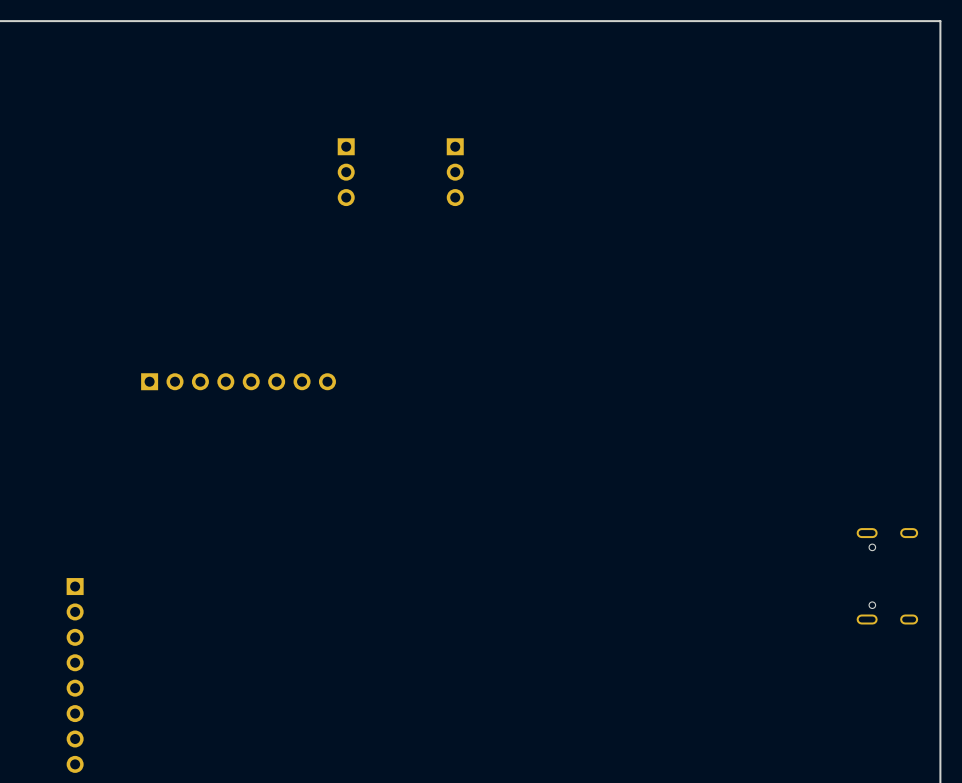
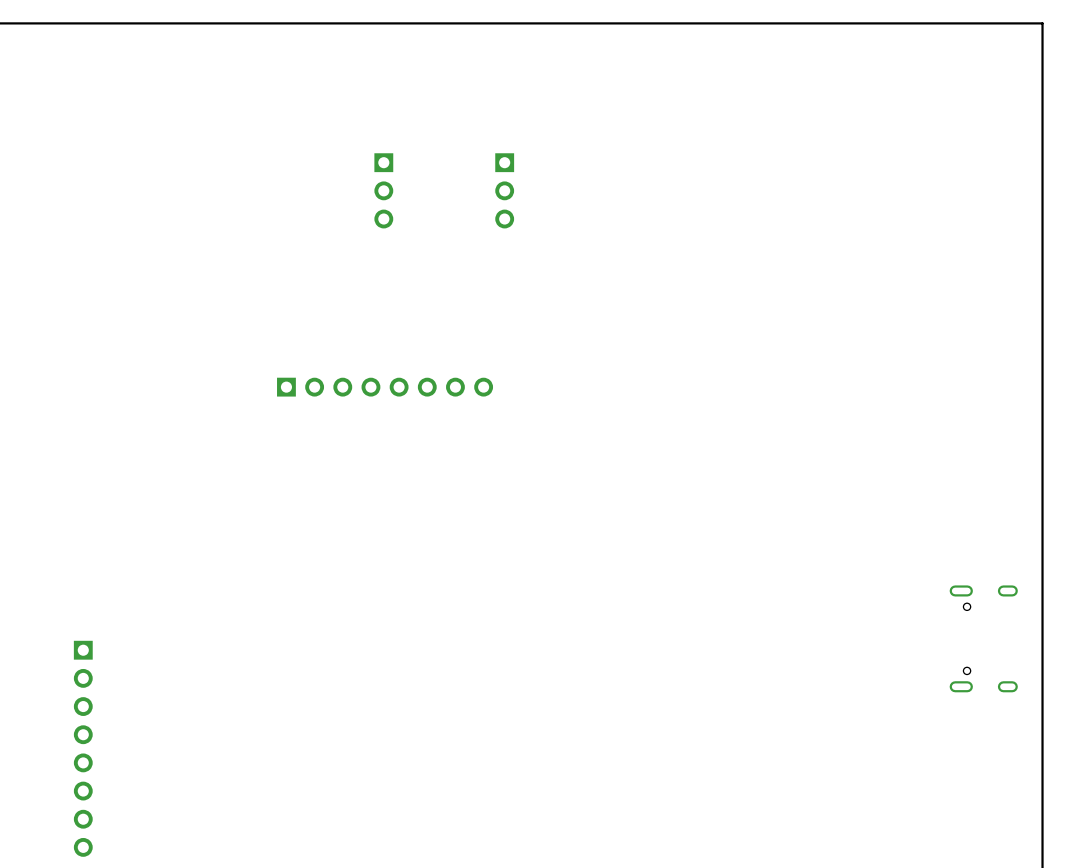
part position: (238, 381) -> (385, 387)

